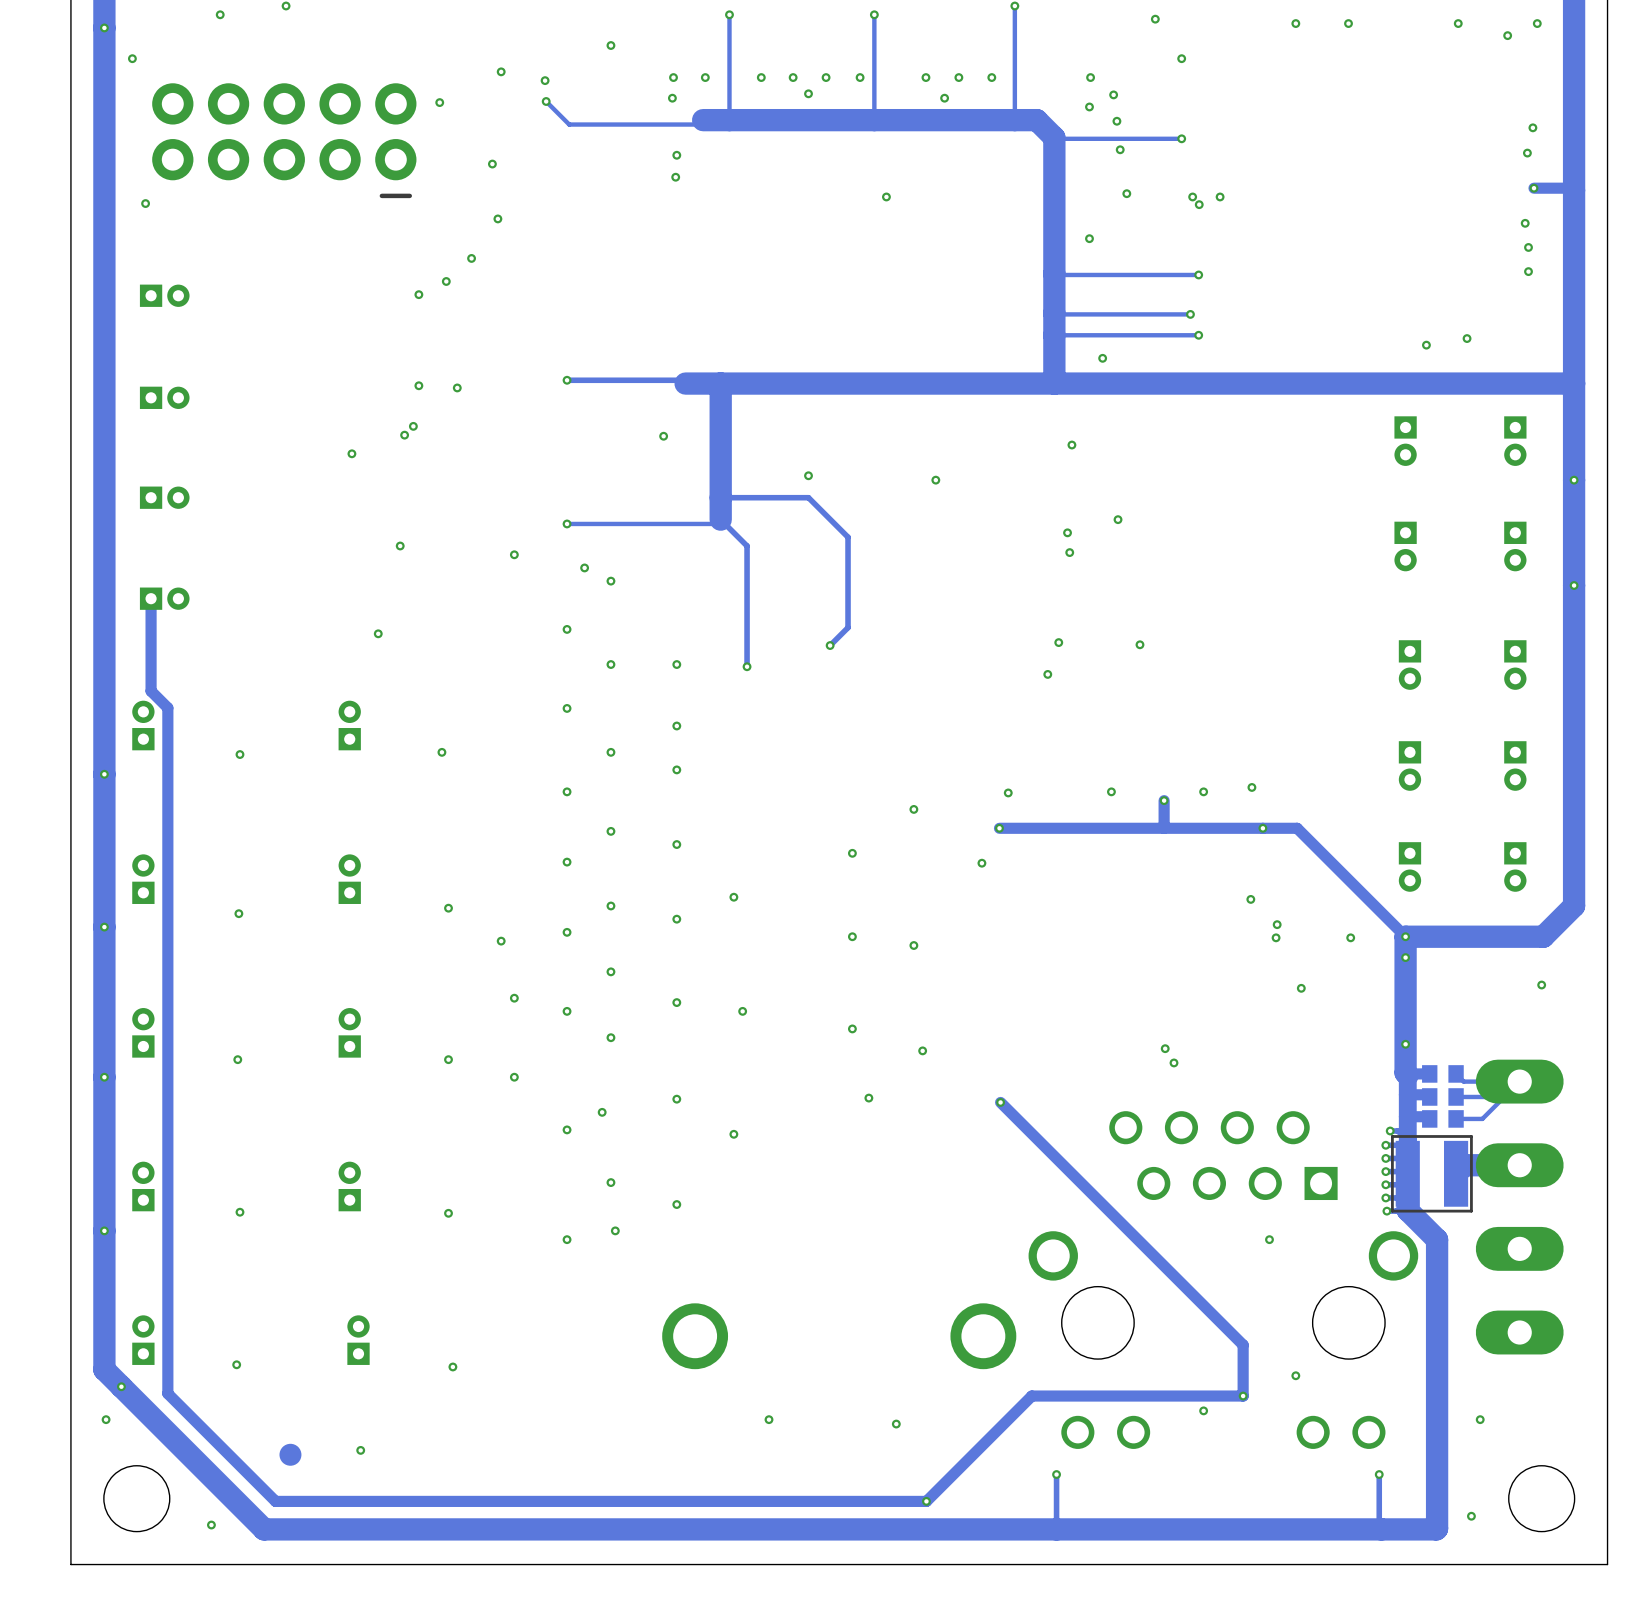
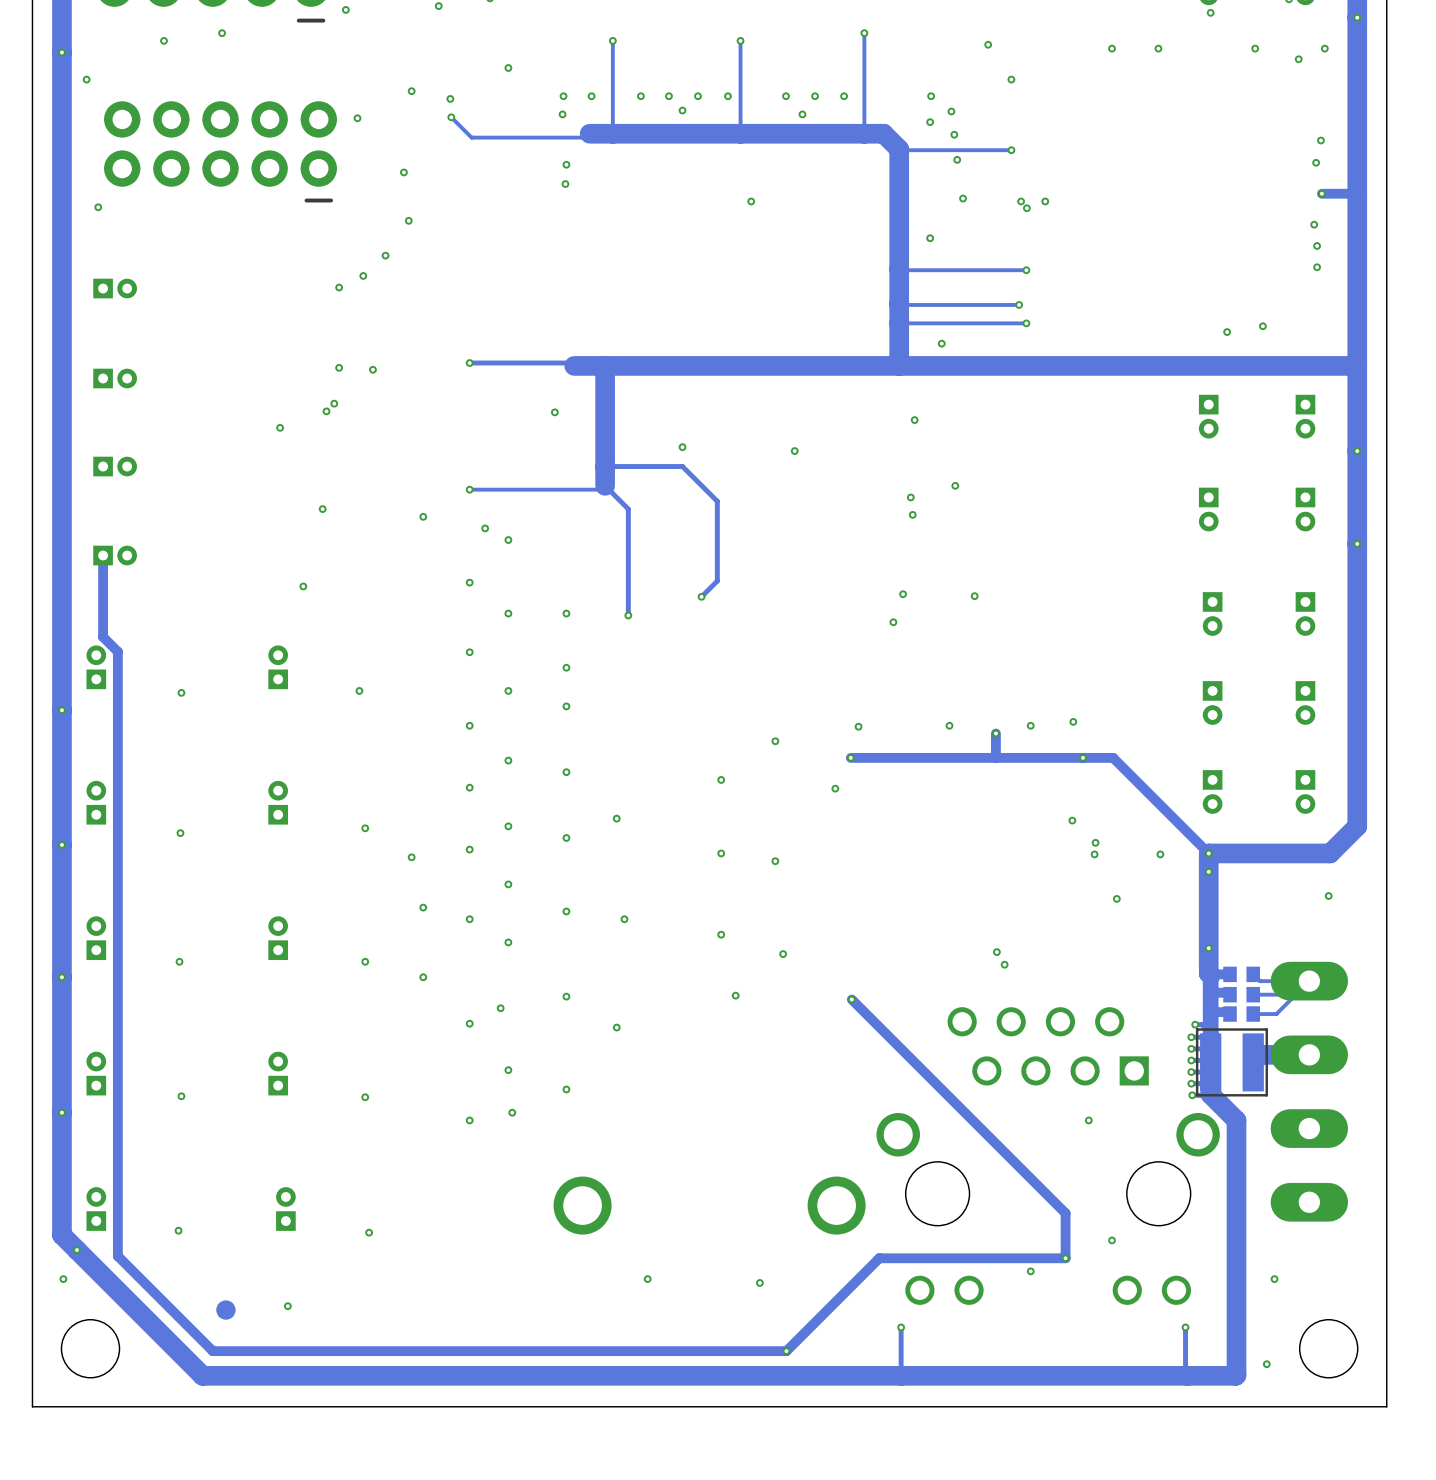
via: (211, 1525) -> none

